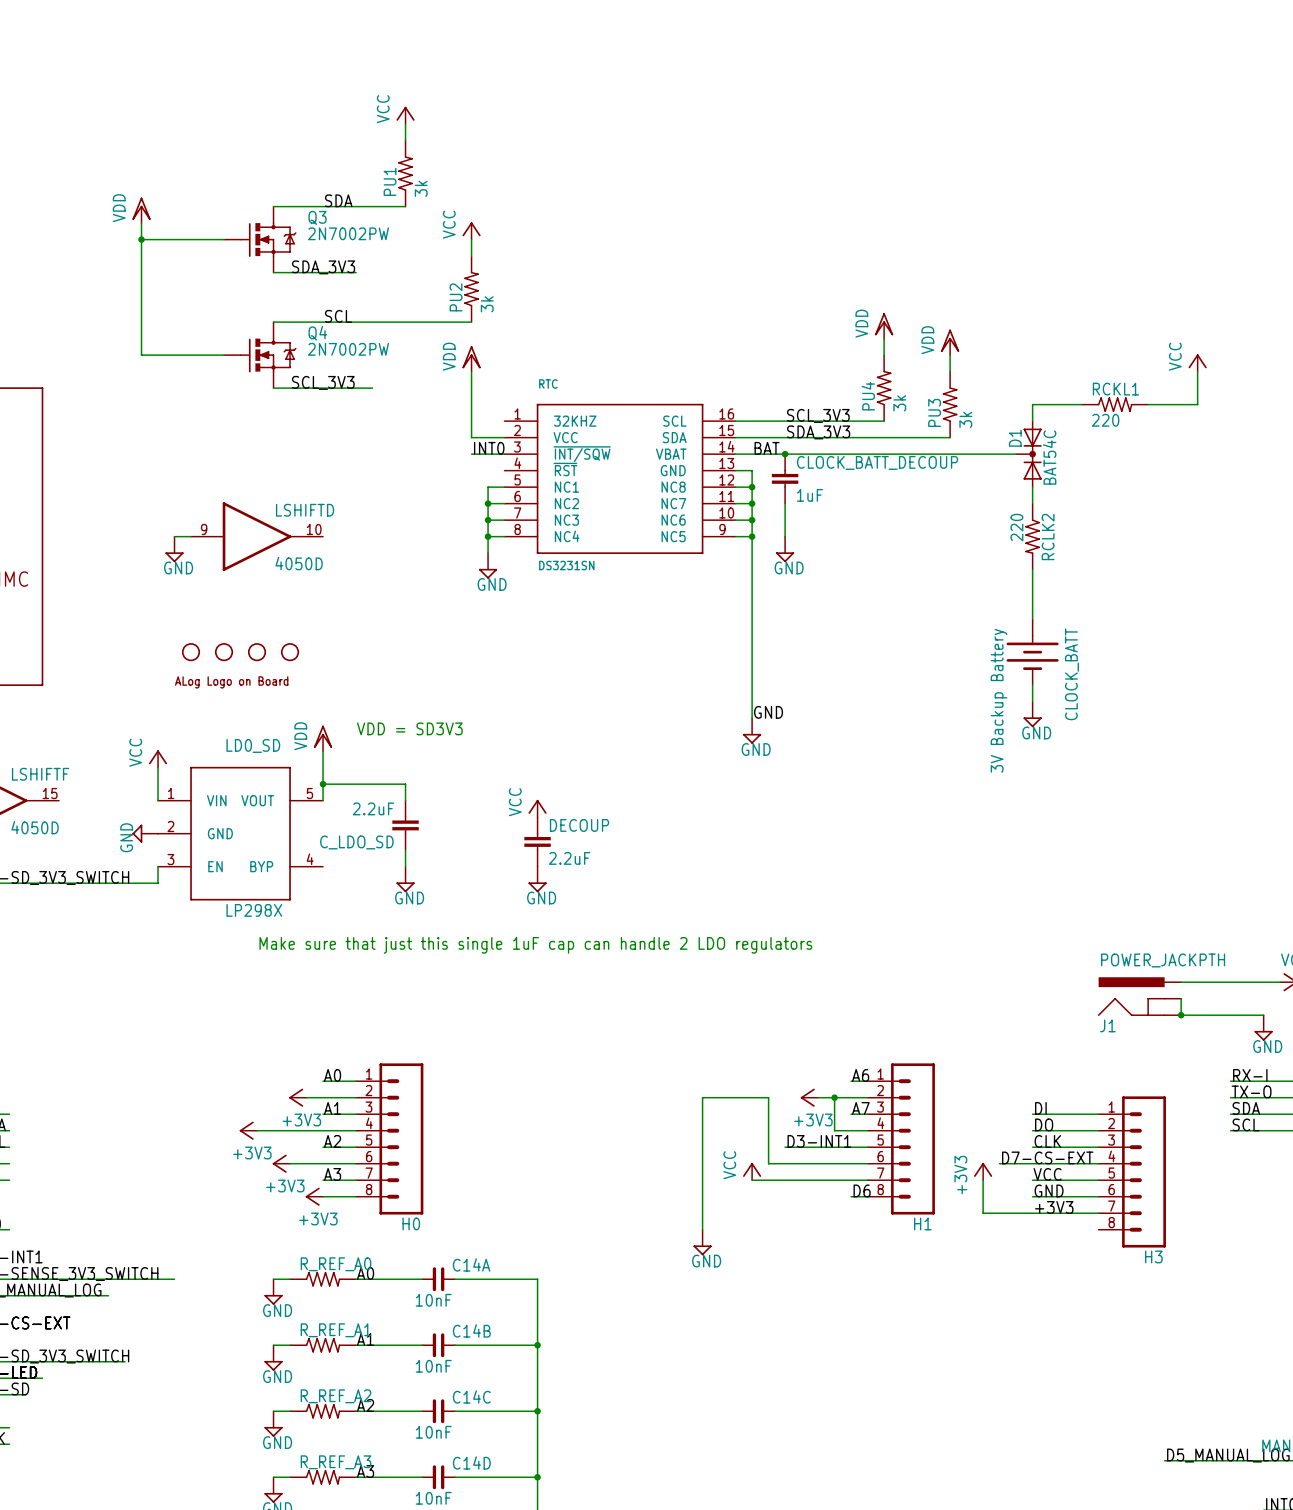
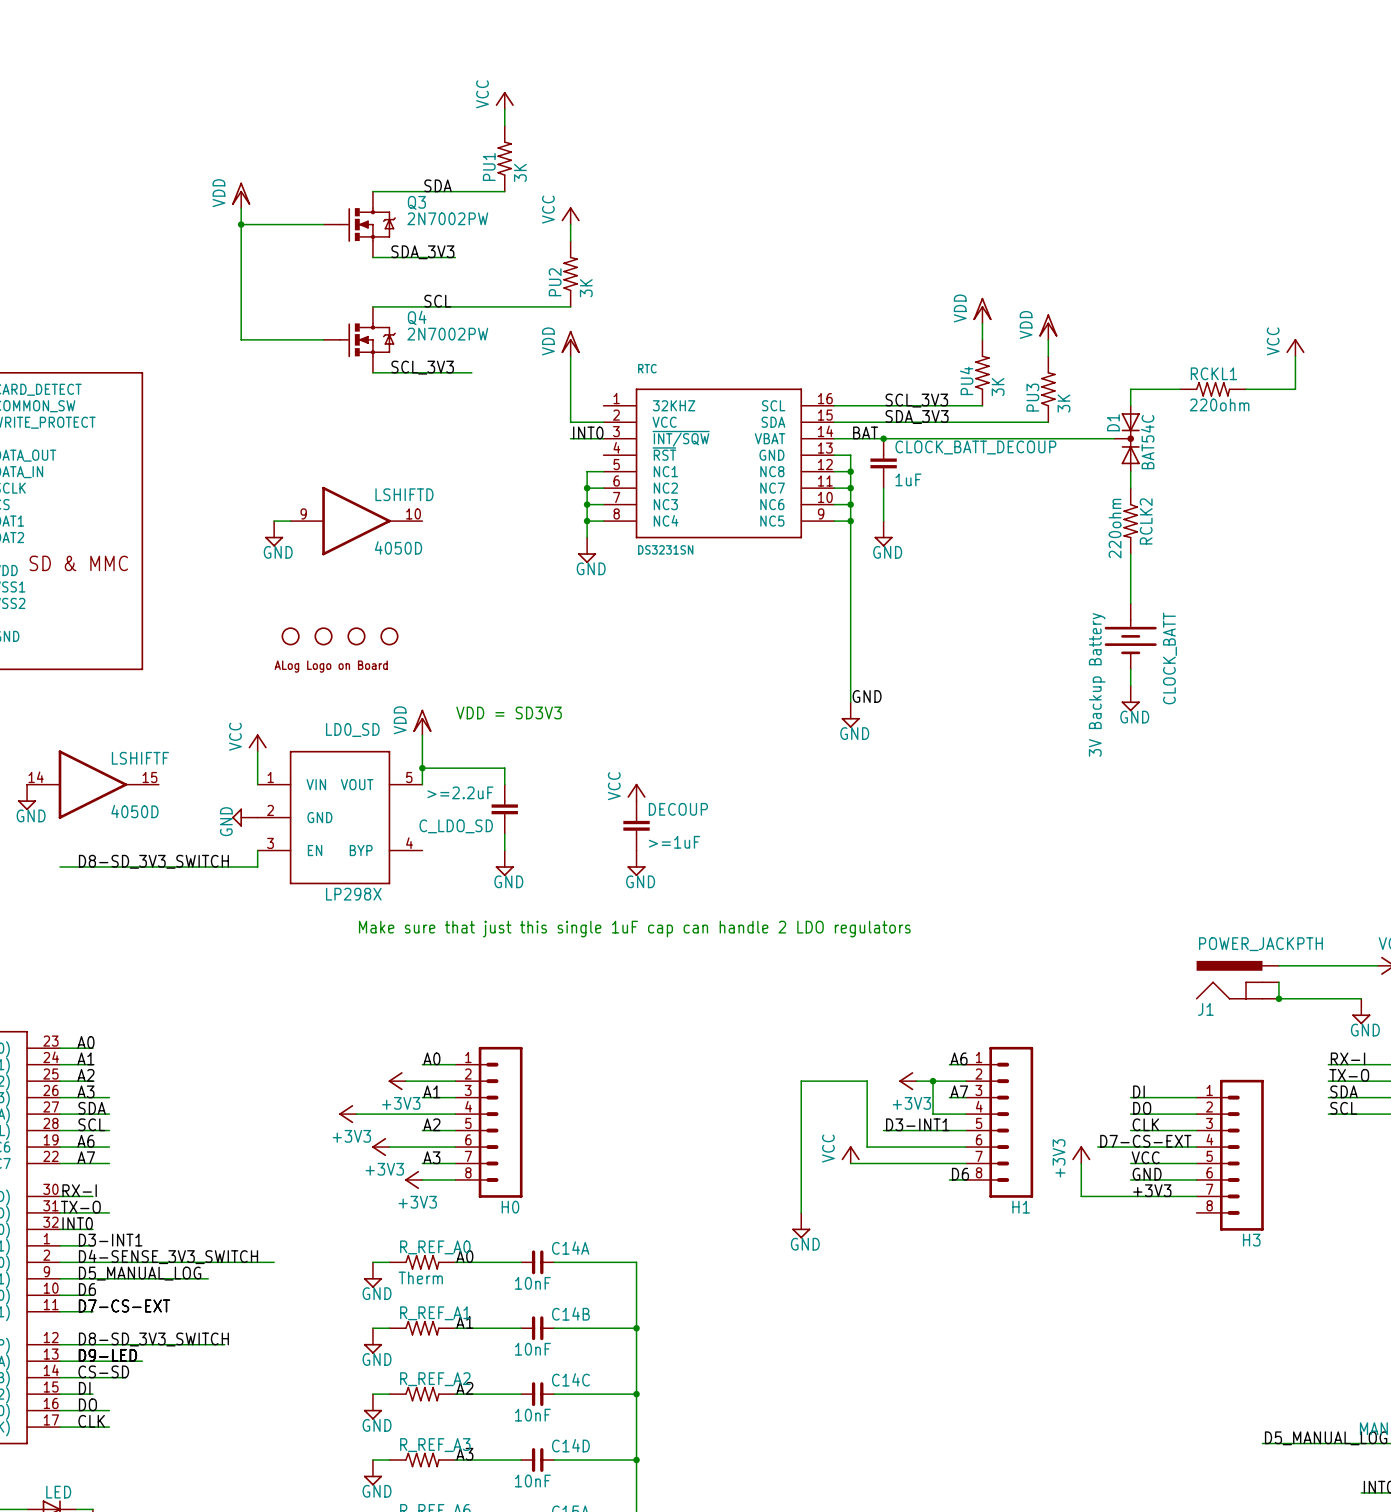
PU1 value: 3k (421, 188) -> 3K (520, 172)
PU2 value: 3k (487, 304) -> 3K (586, 288)
PU4 value: 3k (899, 403) -> 3K (998, 387)
PU3 value: 3k (965, 419) -> 3K (1063, 403)
RCKL1 value: 220 (1105, 420) -> 220ohm (1219, 404)
RCLK2 value: 220 (1016, 527) -> 220ohm (1115, 528)
C_LDO_SD value: 2.2uF (373, 808) -> >=2.2uF (460, 792)
DECOUP value: 2.2uF (569, 858) -> >=1uF (674, 842)
R_REF_A0 value: none -> Therm (420, 1277)

